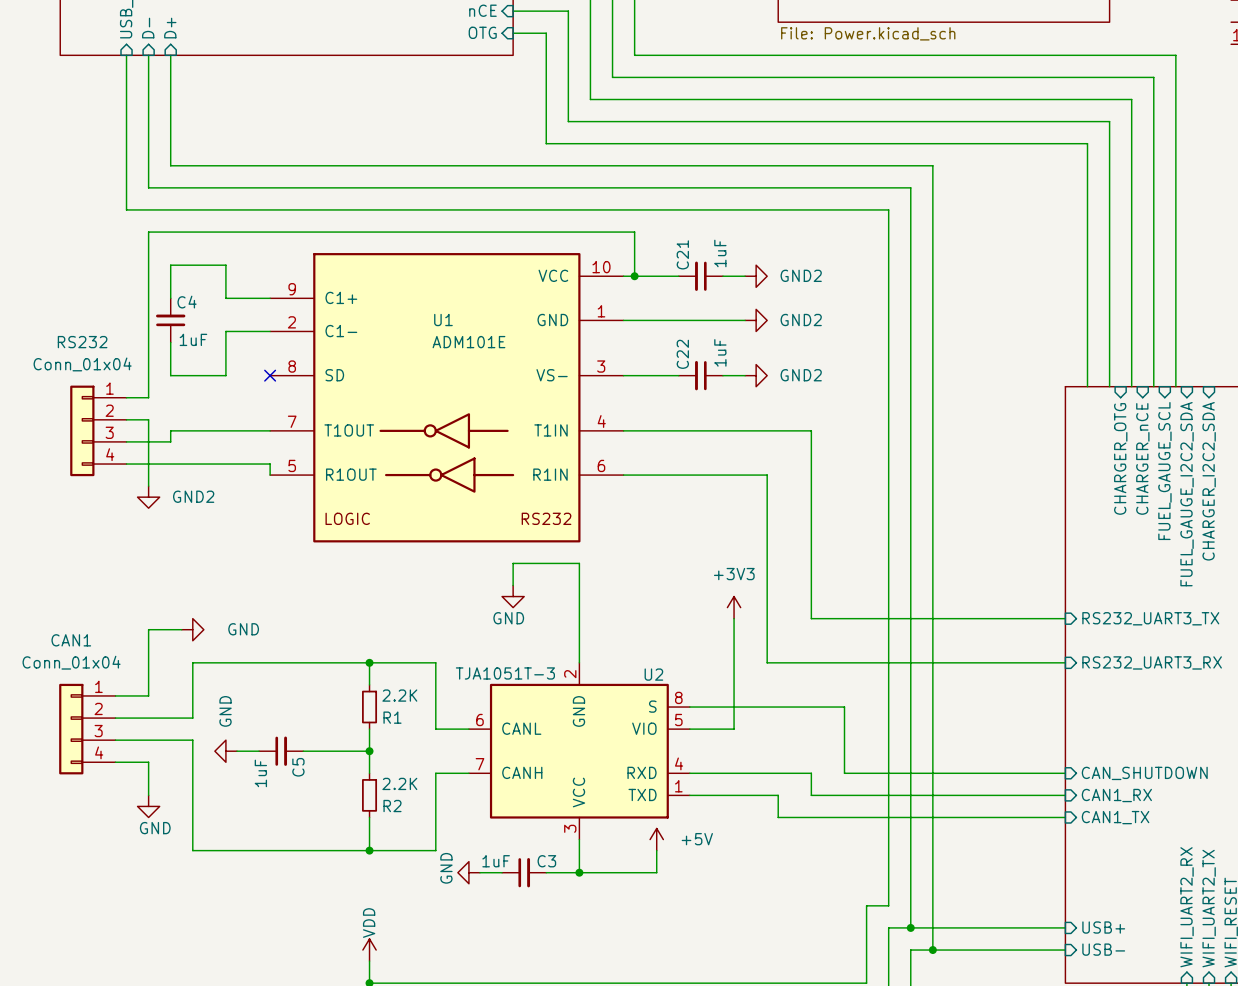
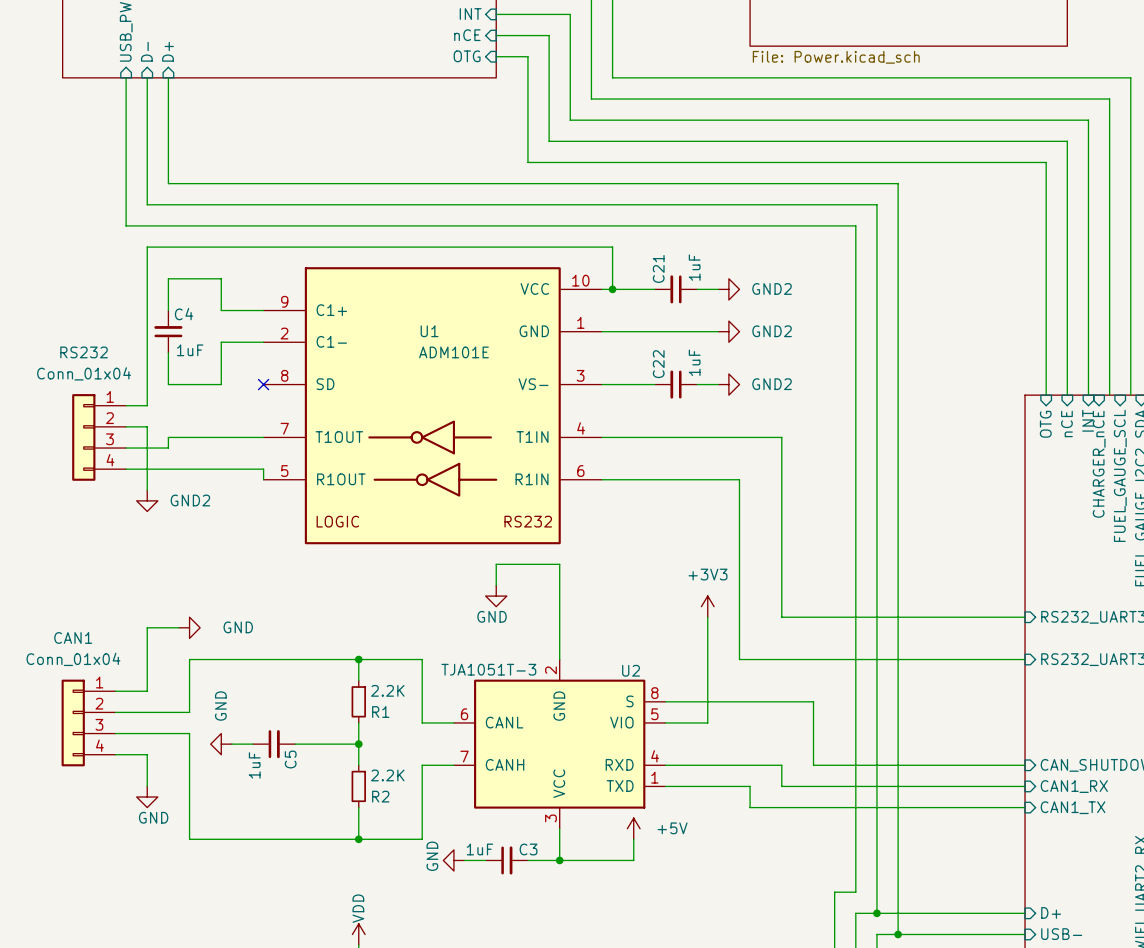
sheet pin: none -> INT (1088, 420)
sheet pin: none -> nCE (1066, 424)
sheet pin: none -> OTG (1045, 424)
sheet pin: CHARGER_OTG (1120, 458) -> none
sheet pin: USB+ (1103, 927) -> D+ (1051, 912)

